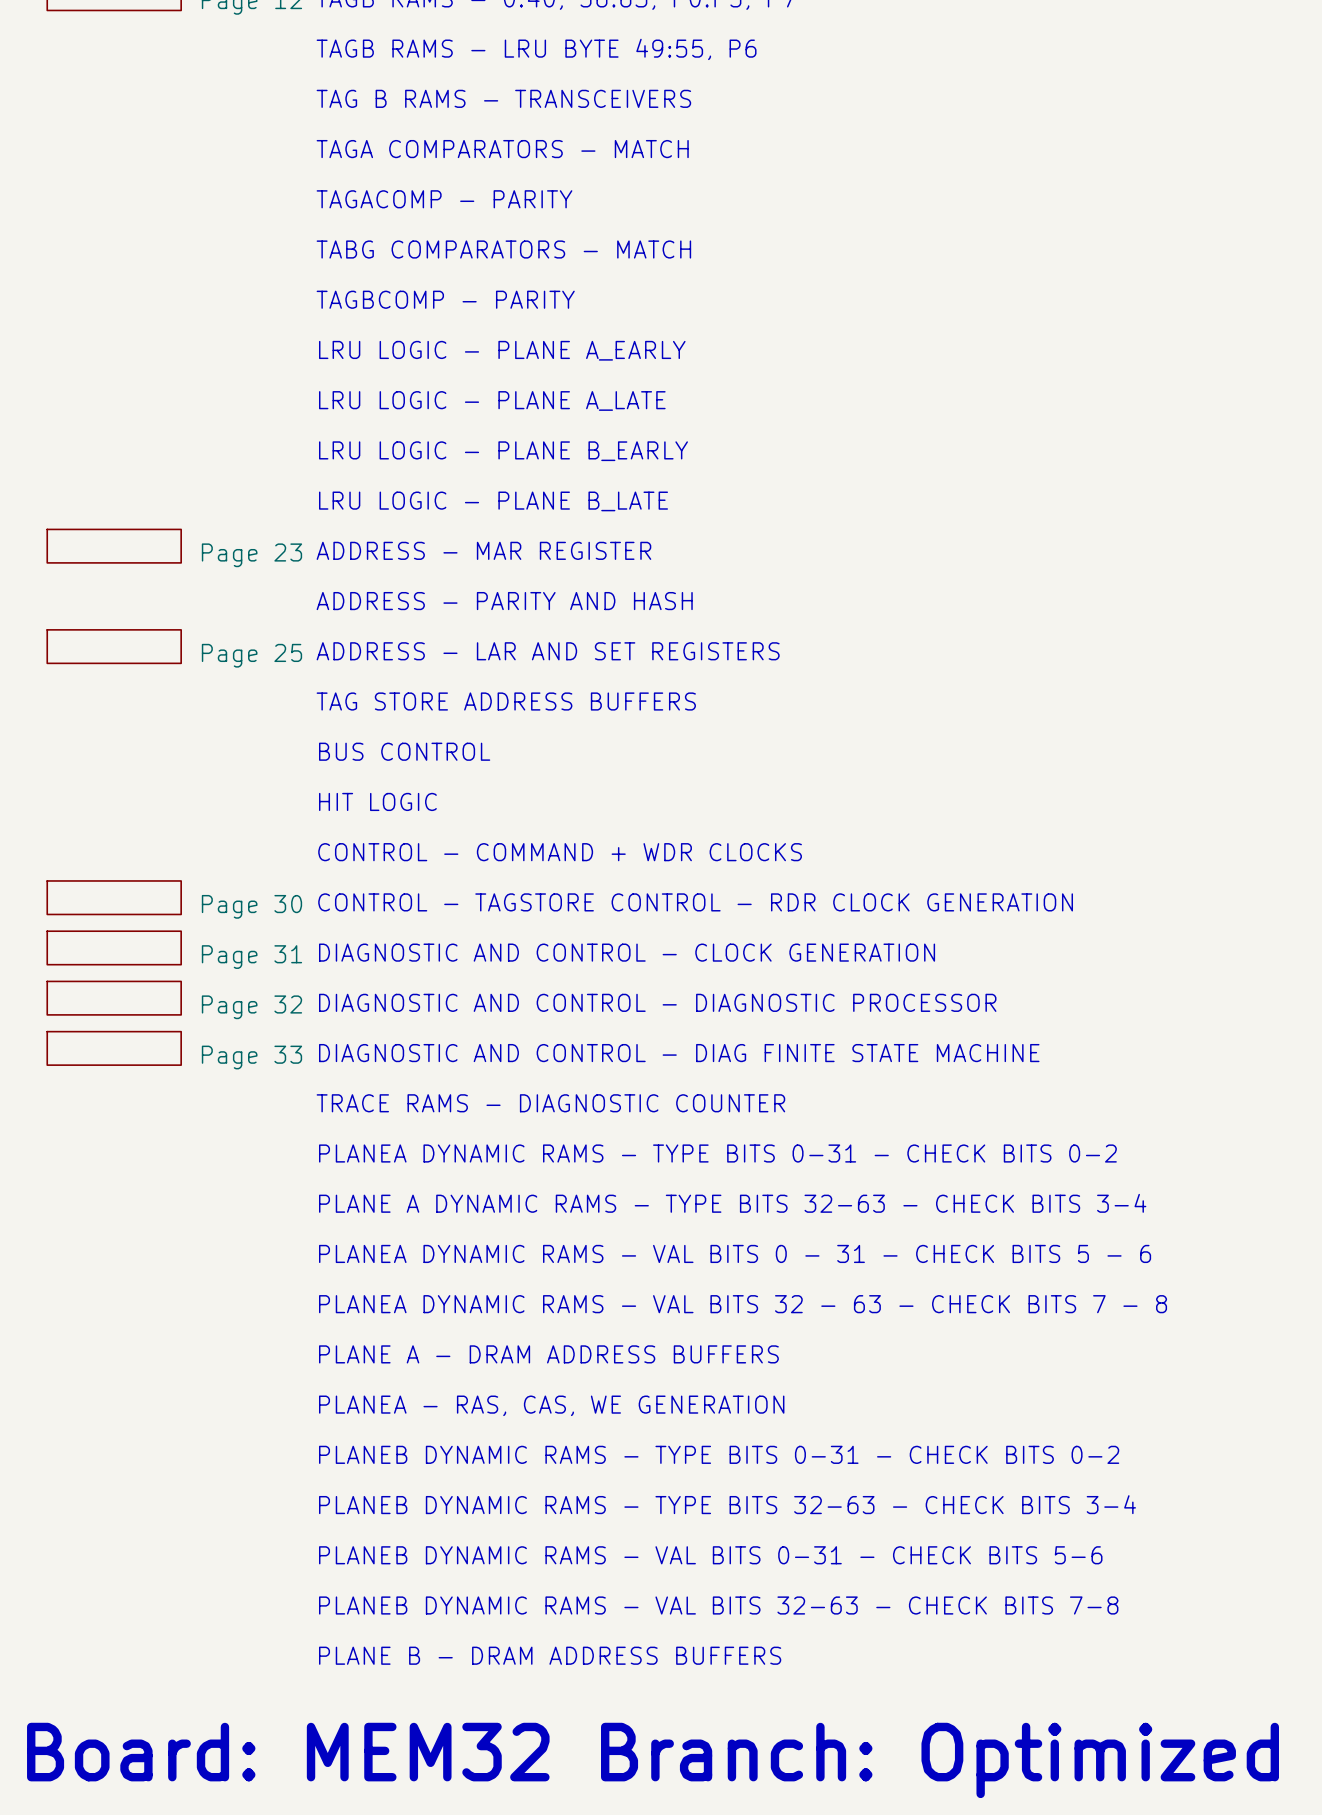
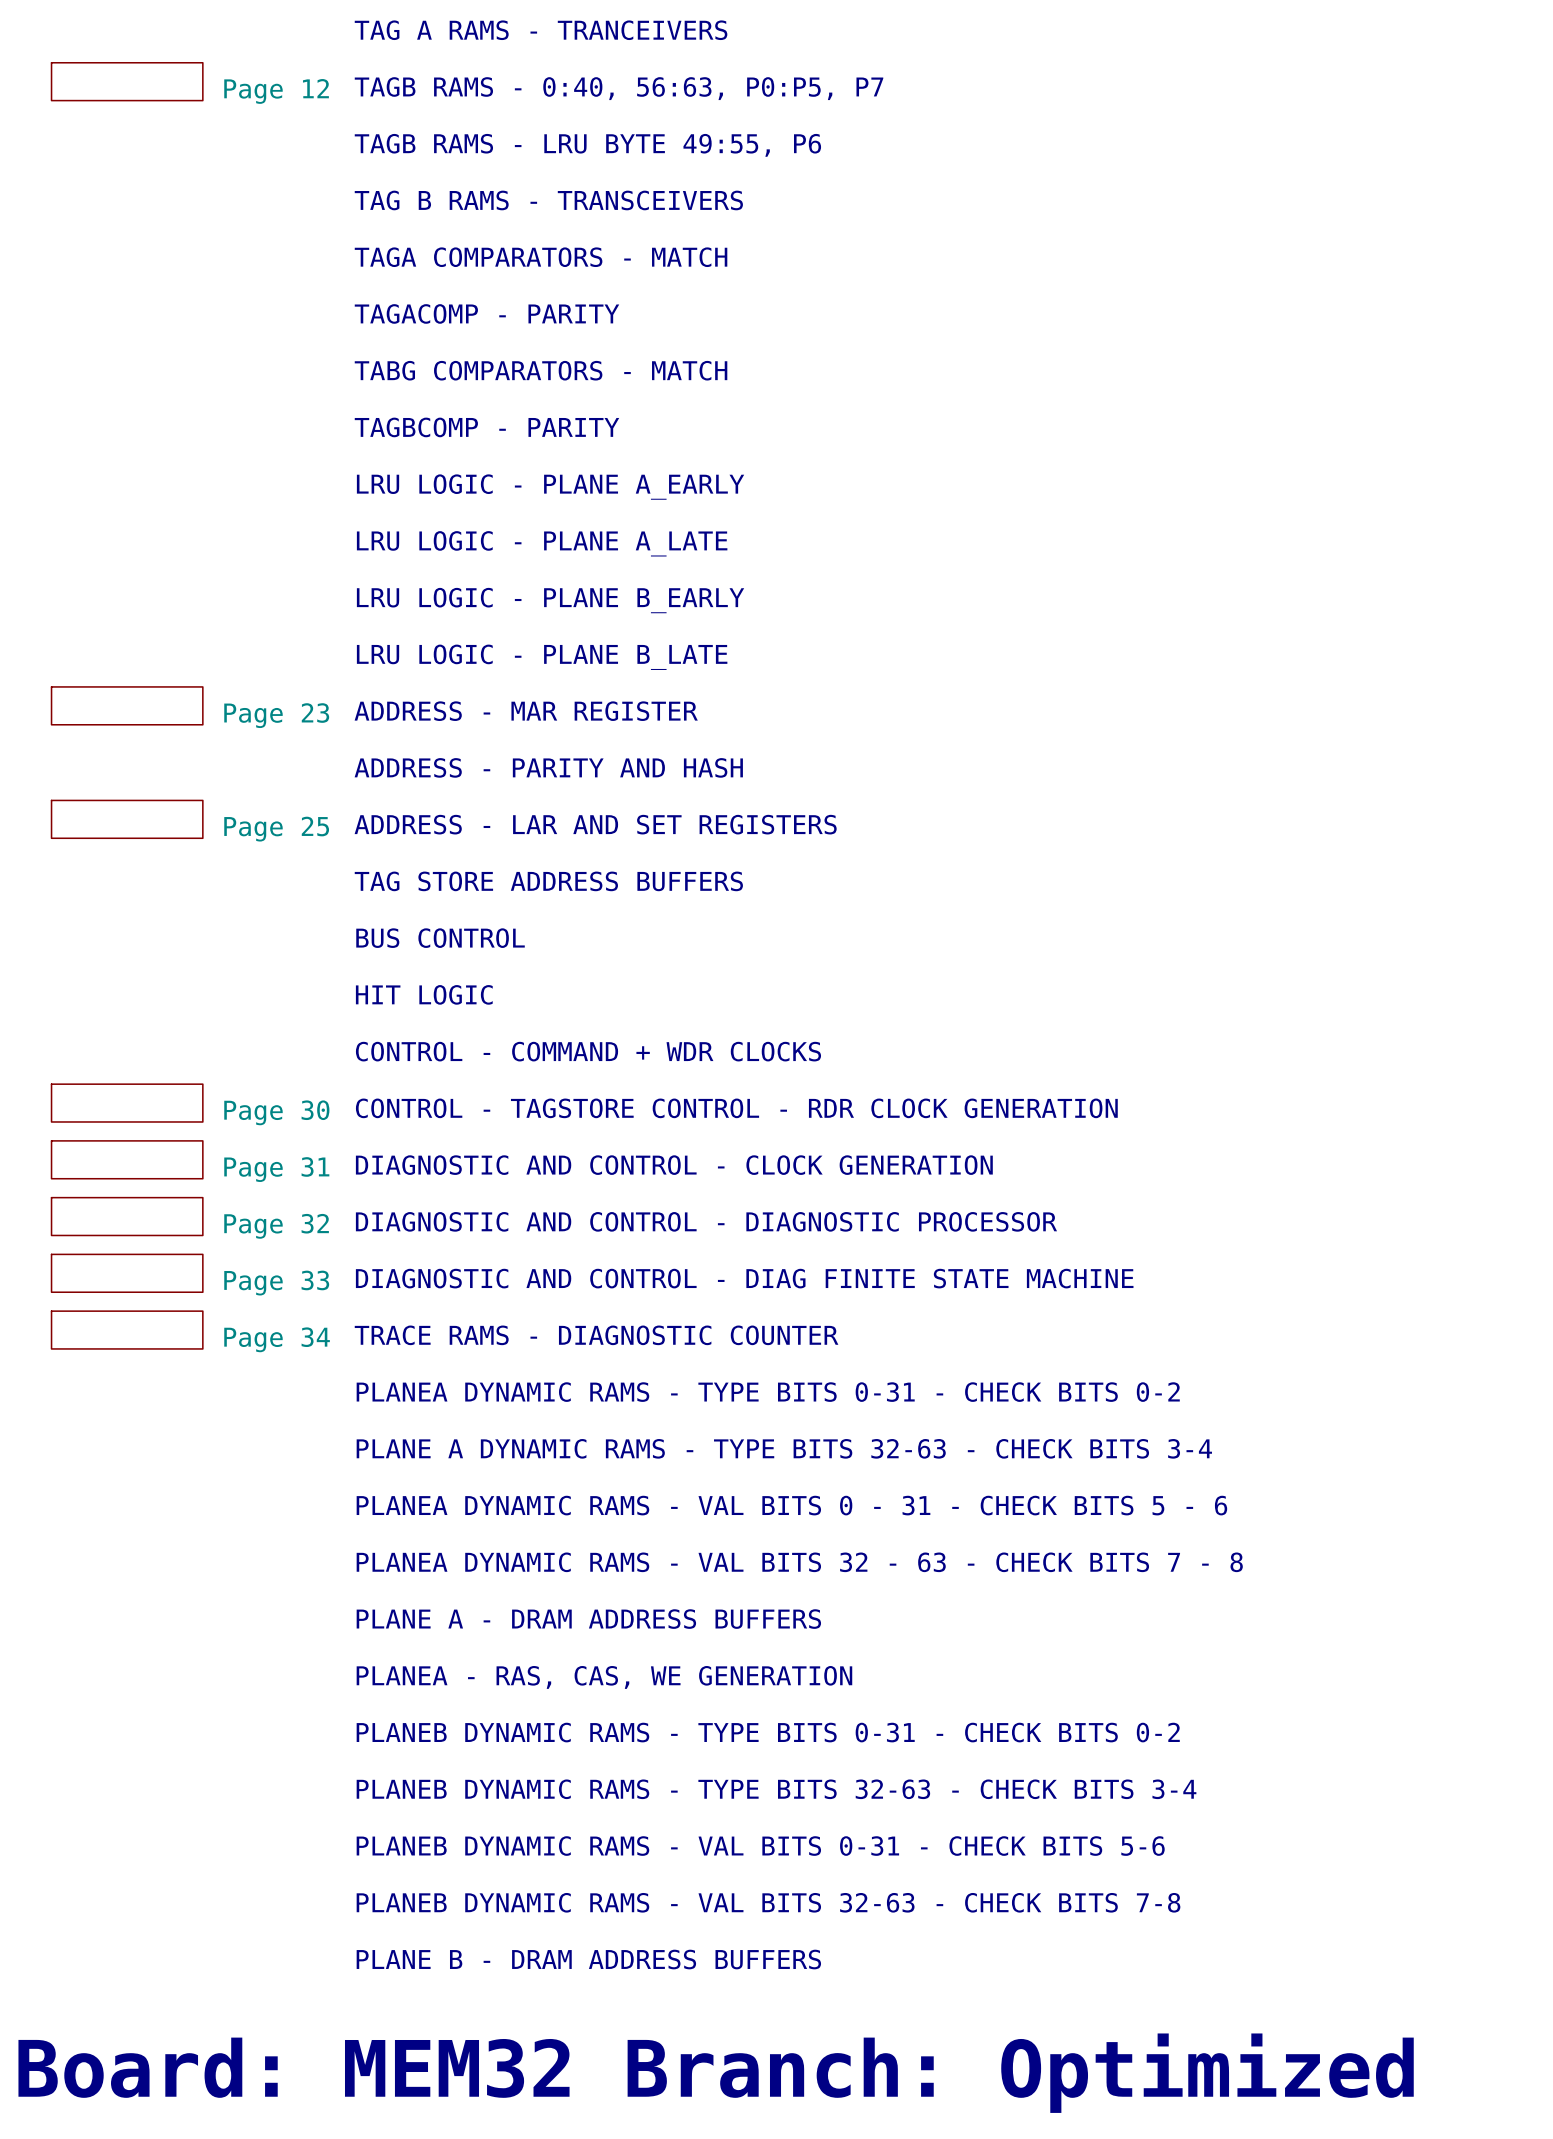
sheet Page 34: none -> (127, 1330)

